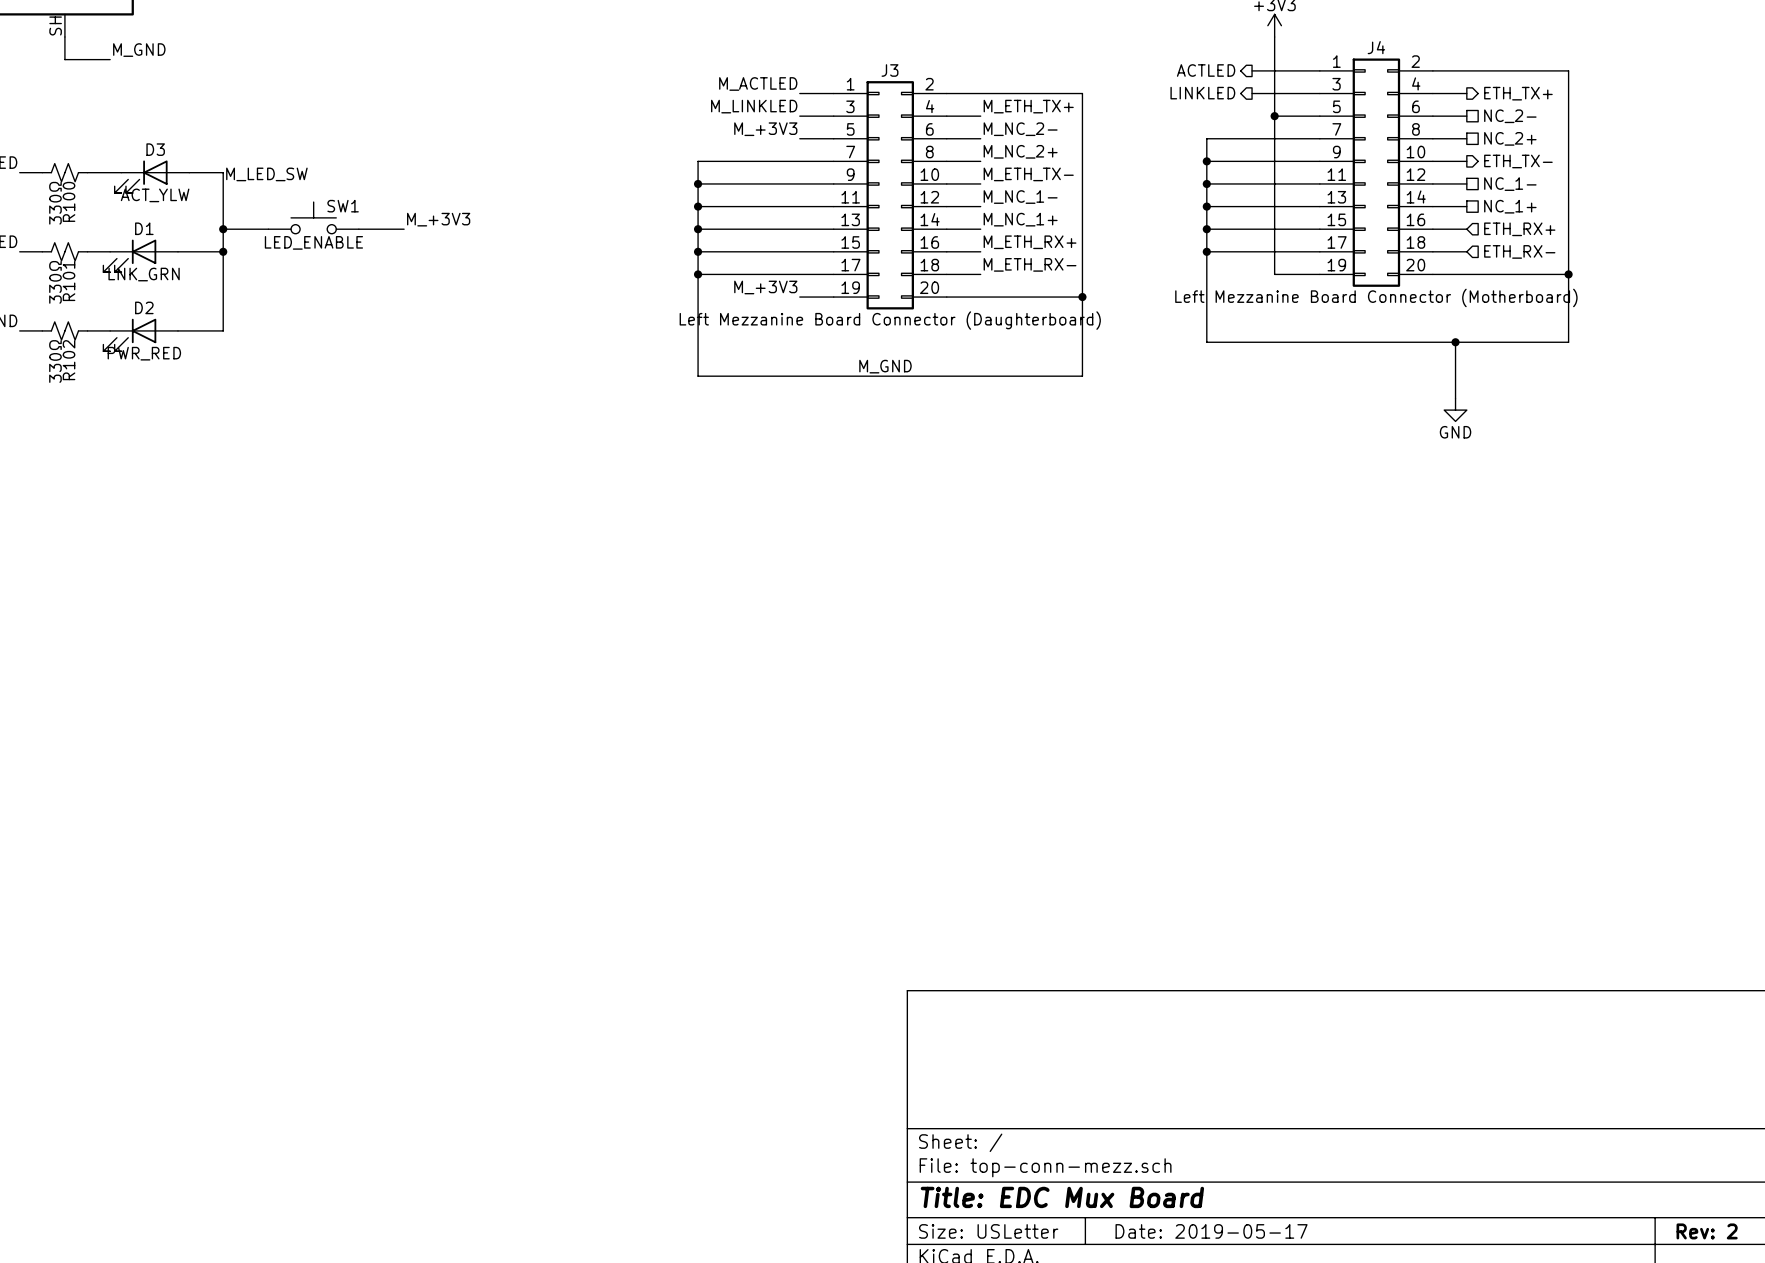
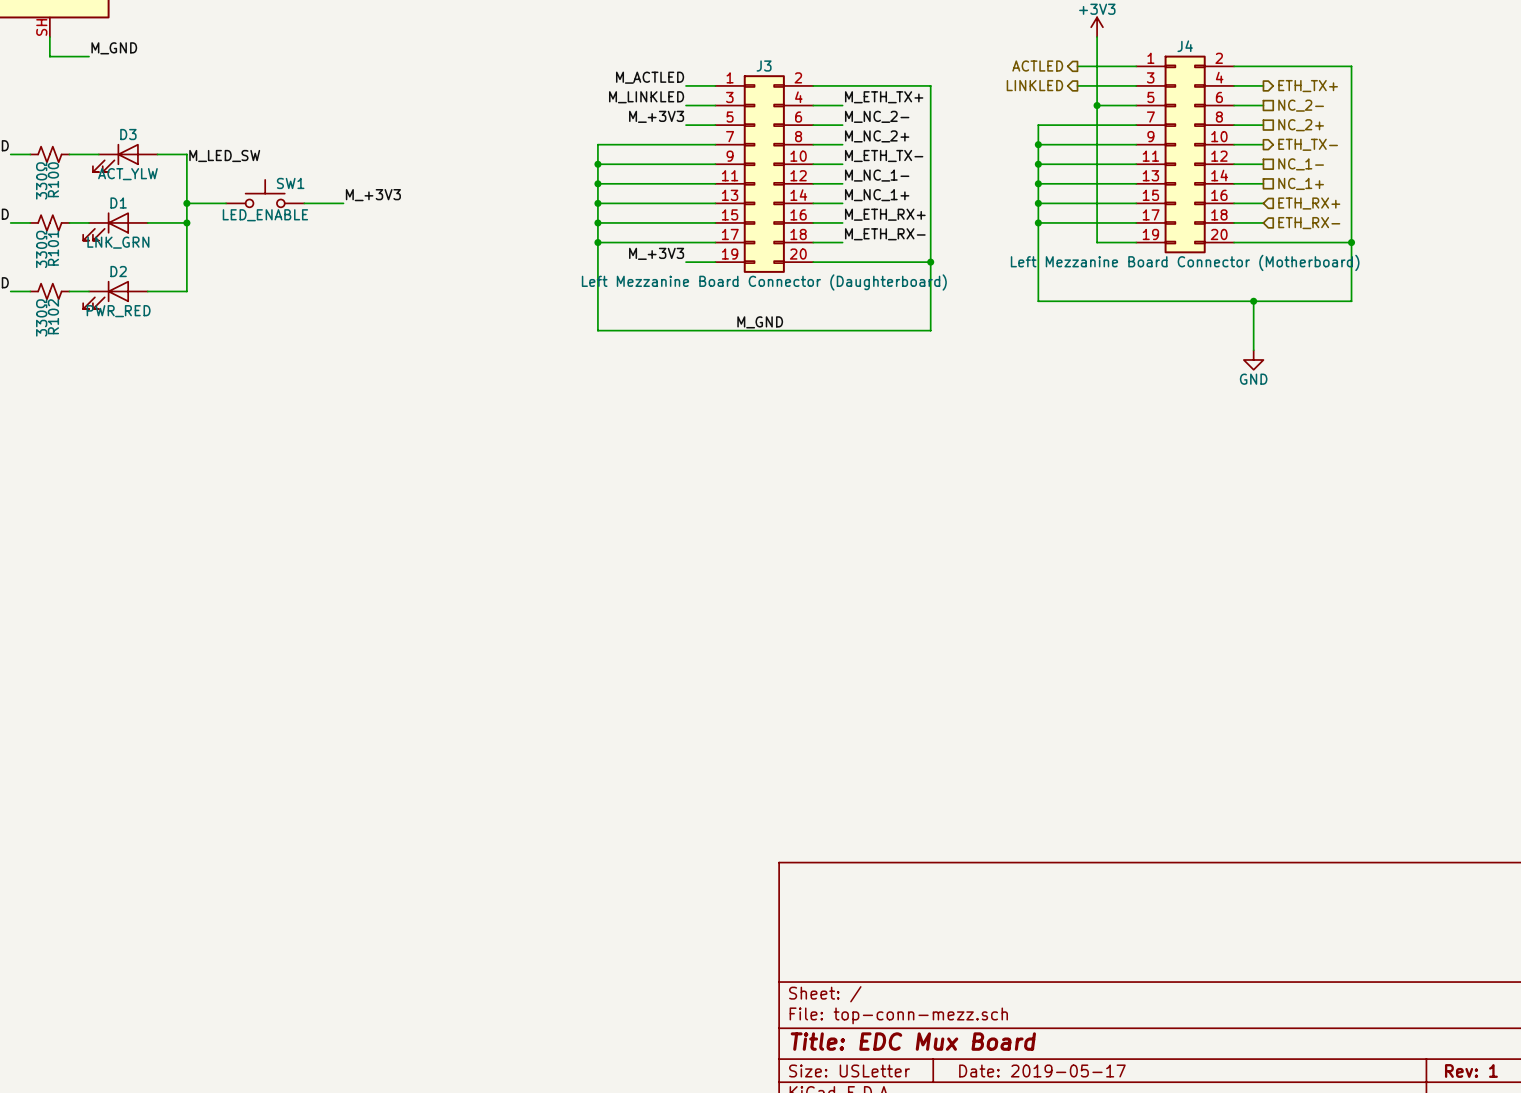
title block: Rev: 2 (1707, 1231) -> Rev: 1 (1471, 1070)

